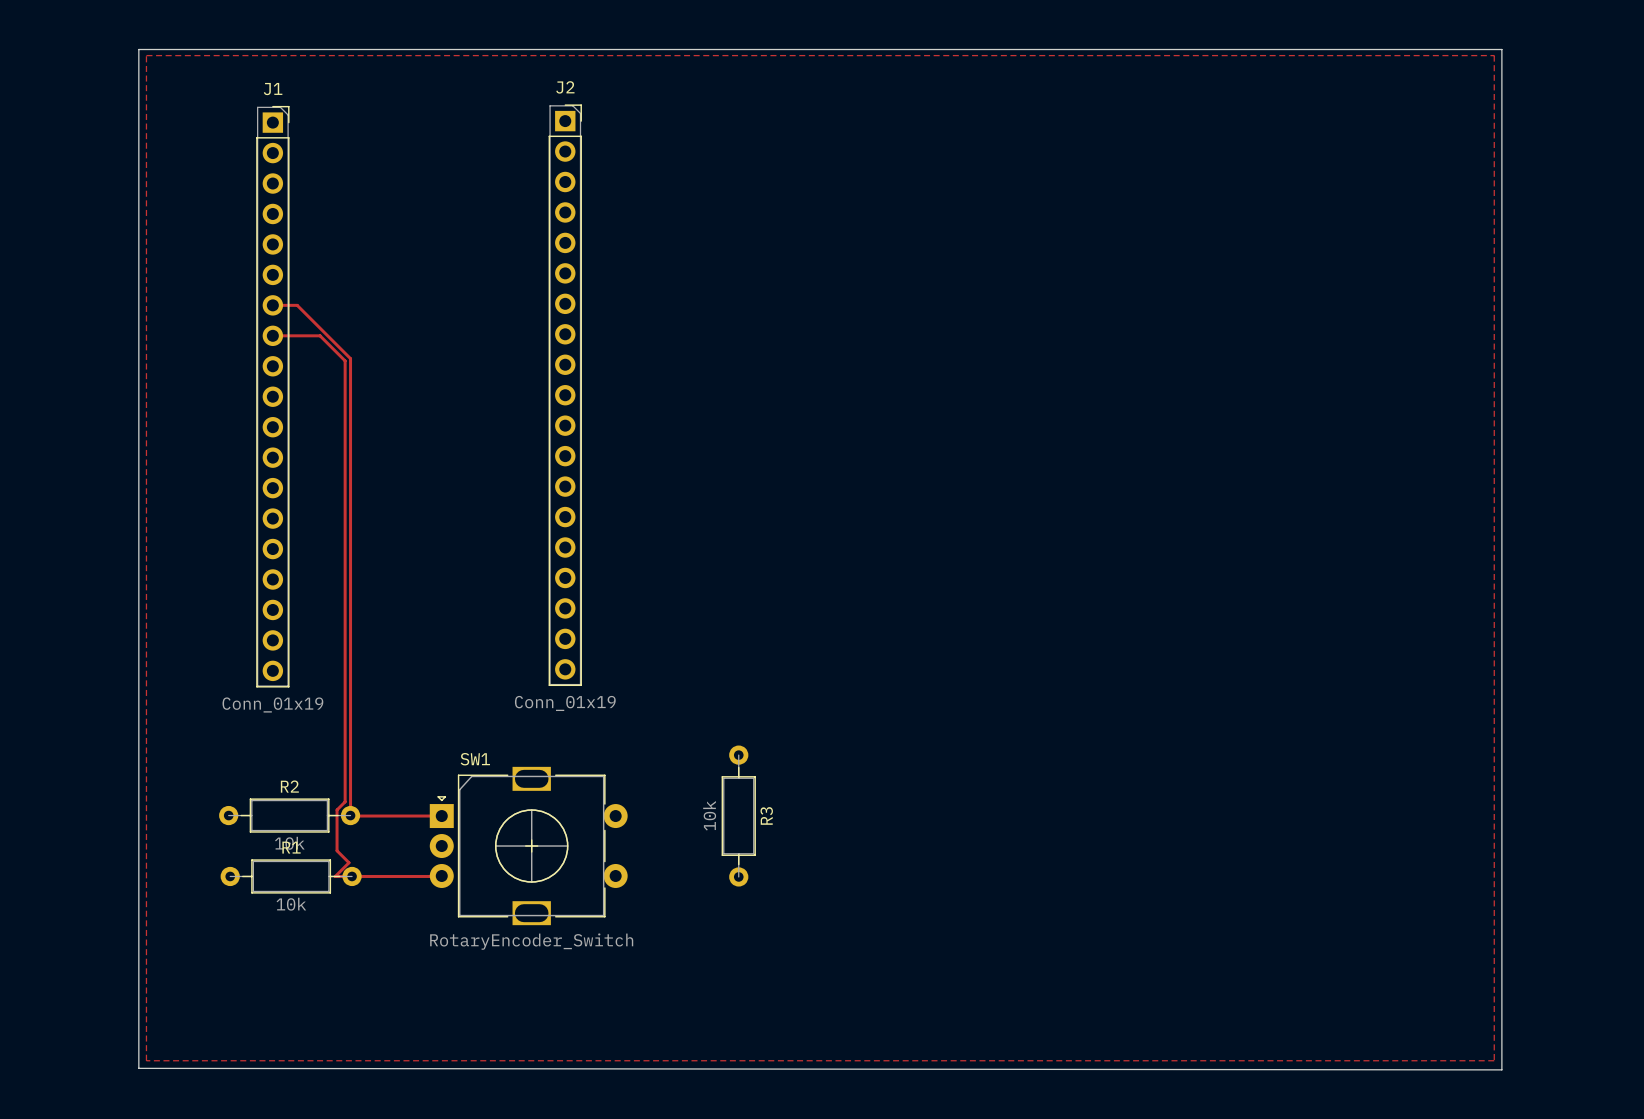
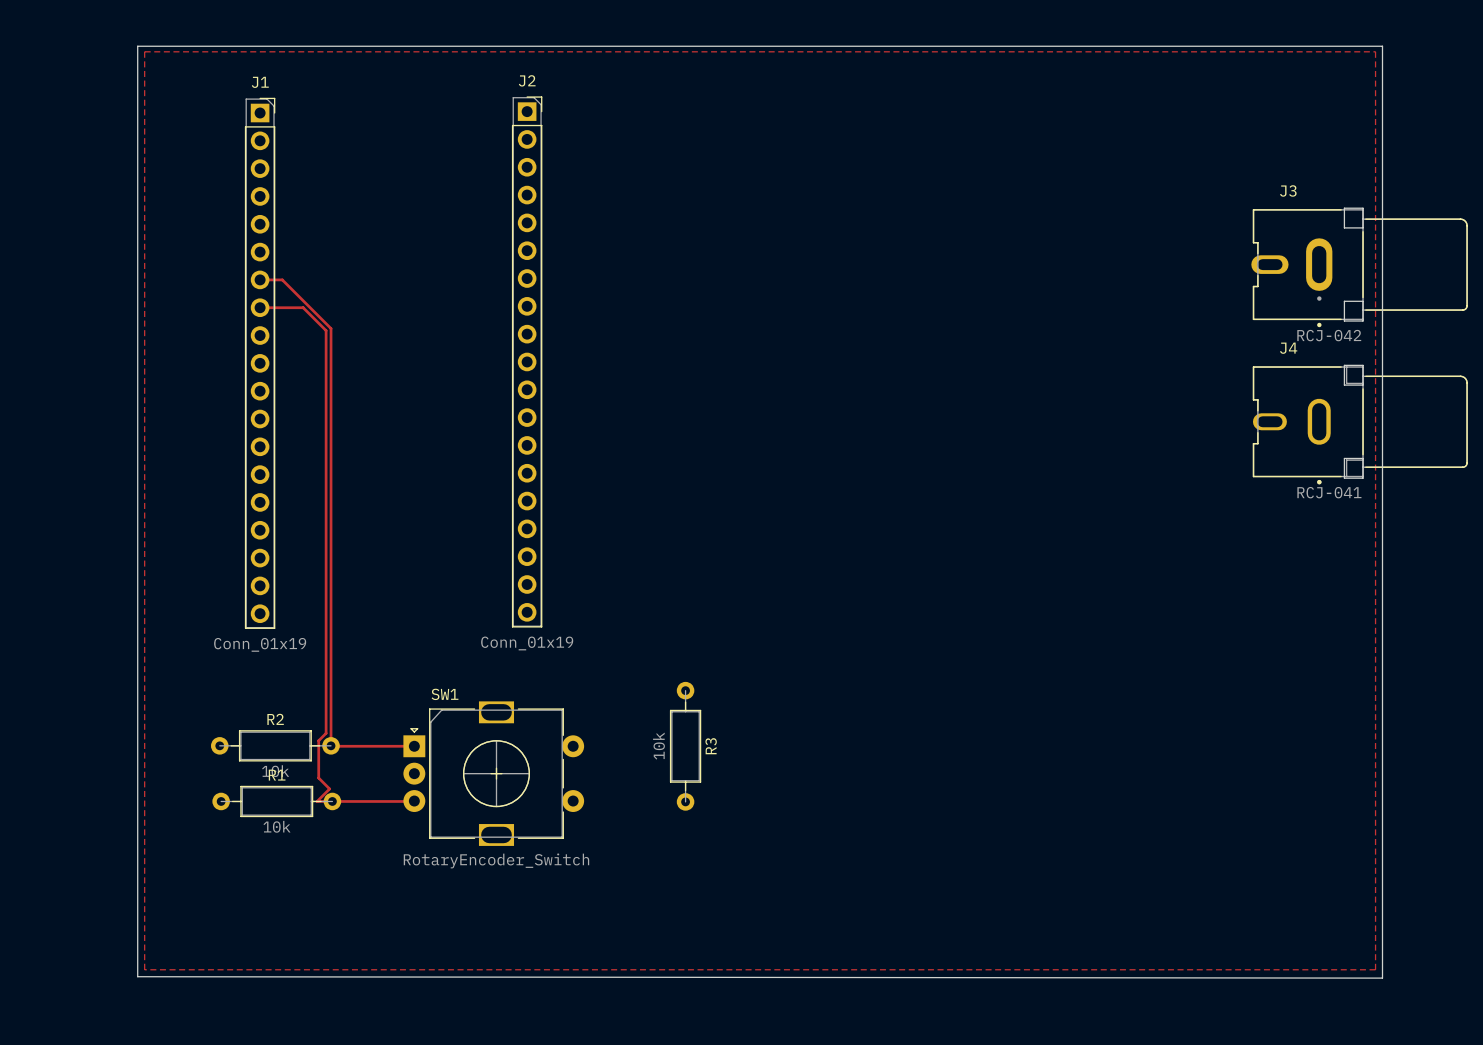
J3: none -> RCJ-042 (1359, 267)
J4: none -> RCJ-041 (1360, 424)

